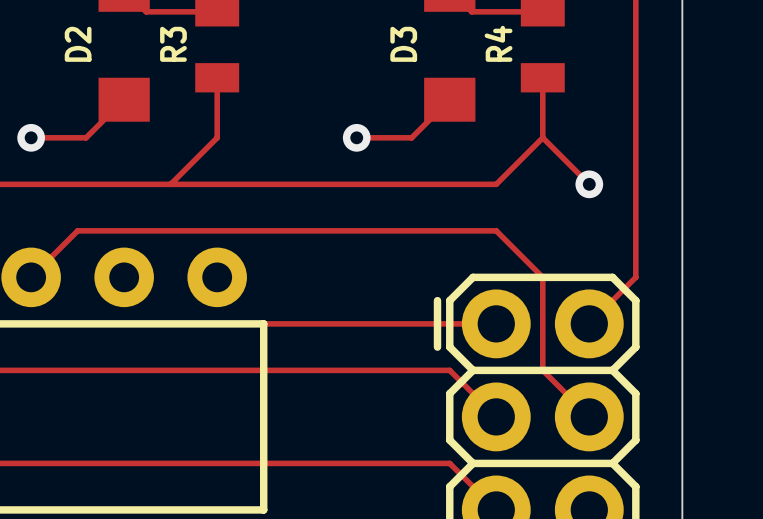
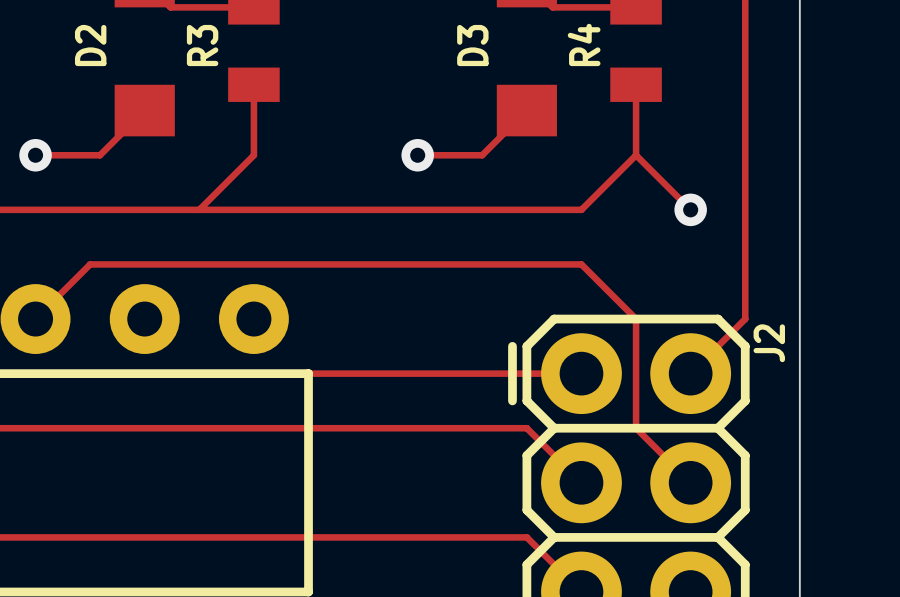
J2 name: none -> J2 (769, 343)

